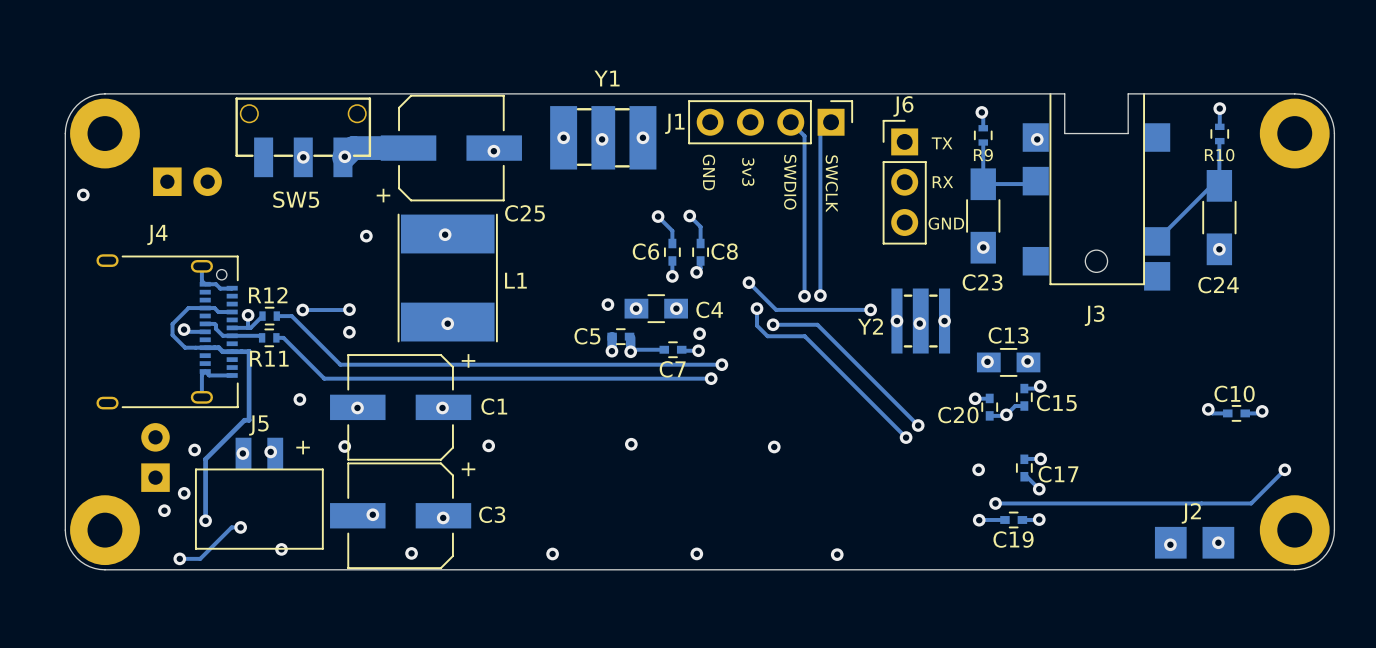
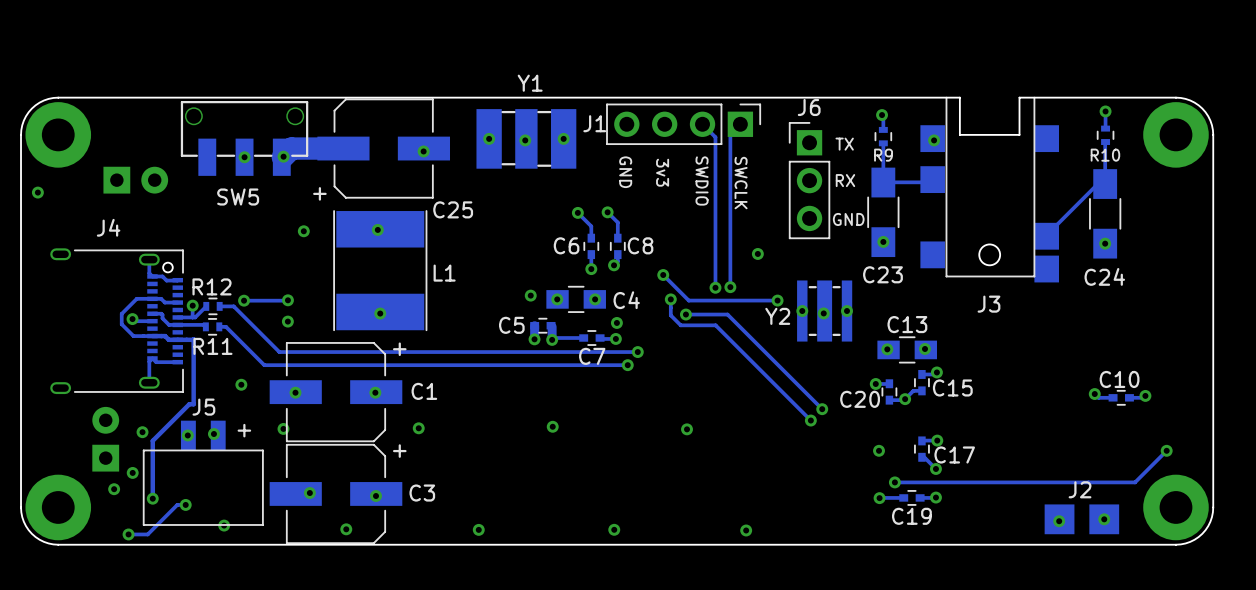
via: none -> (757, 253)

